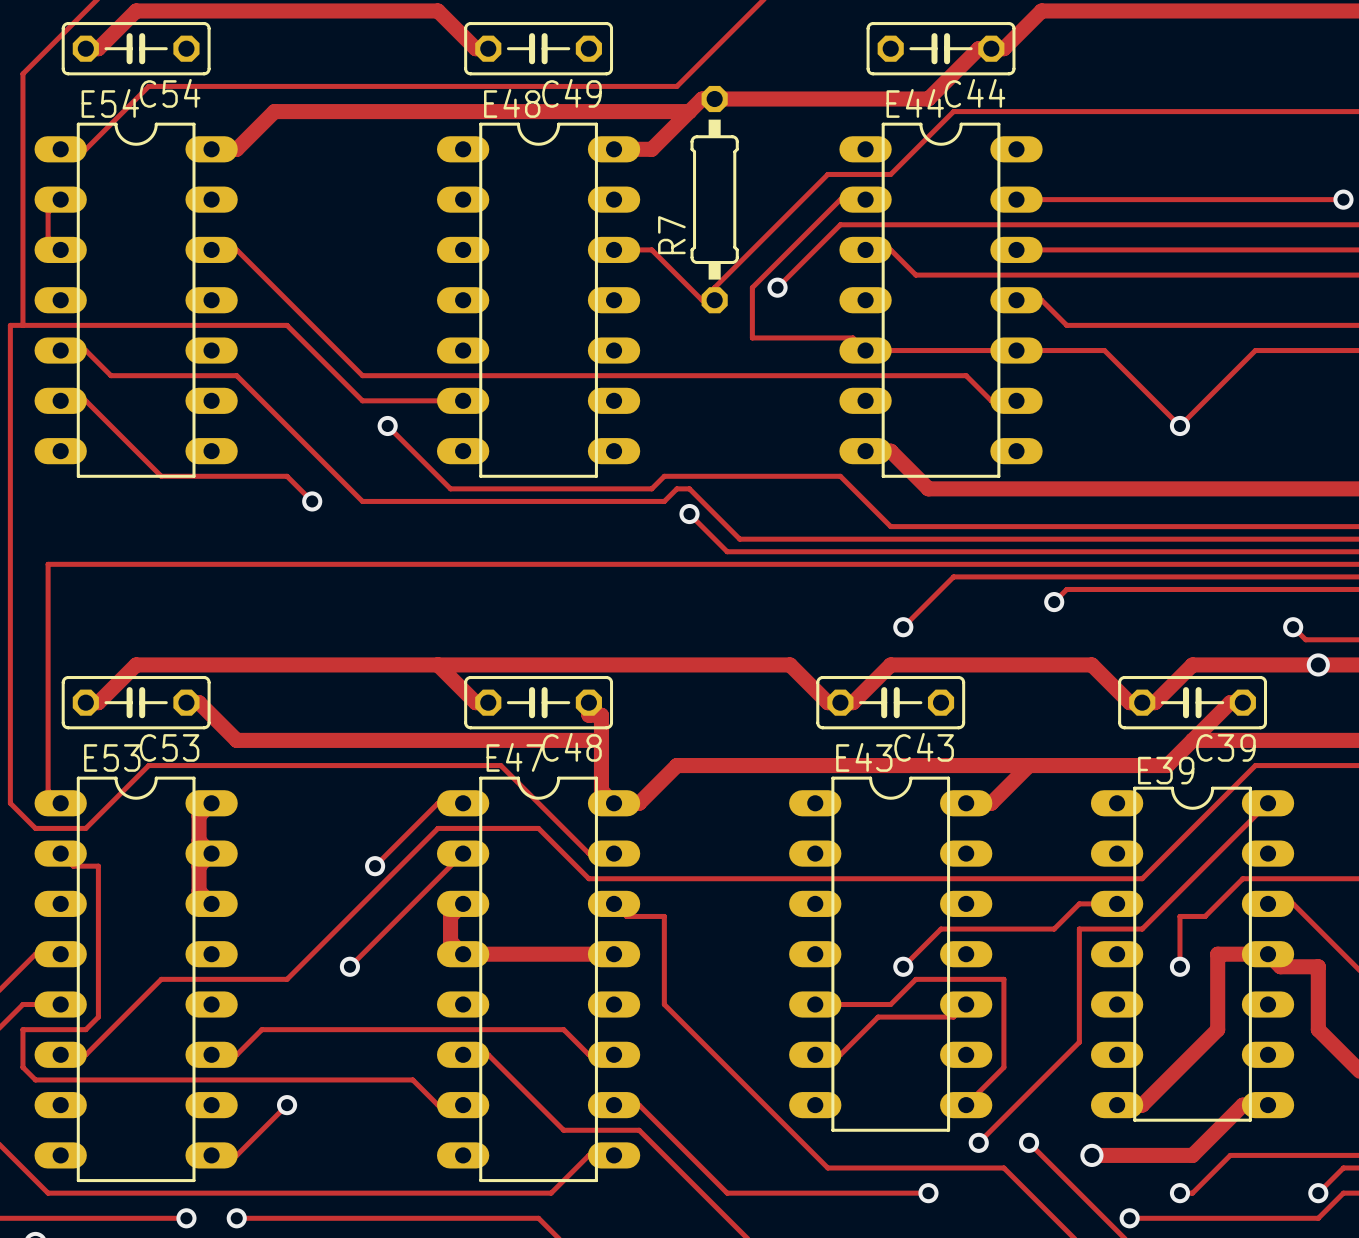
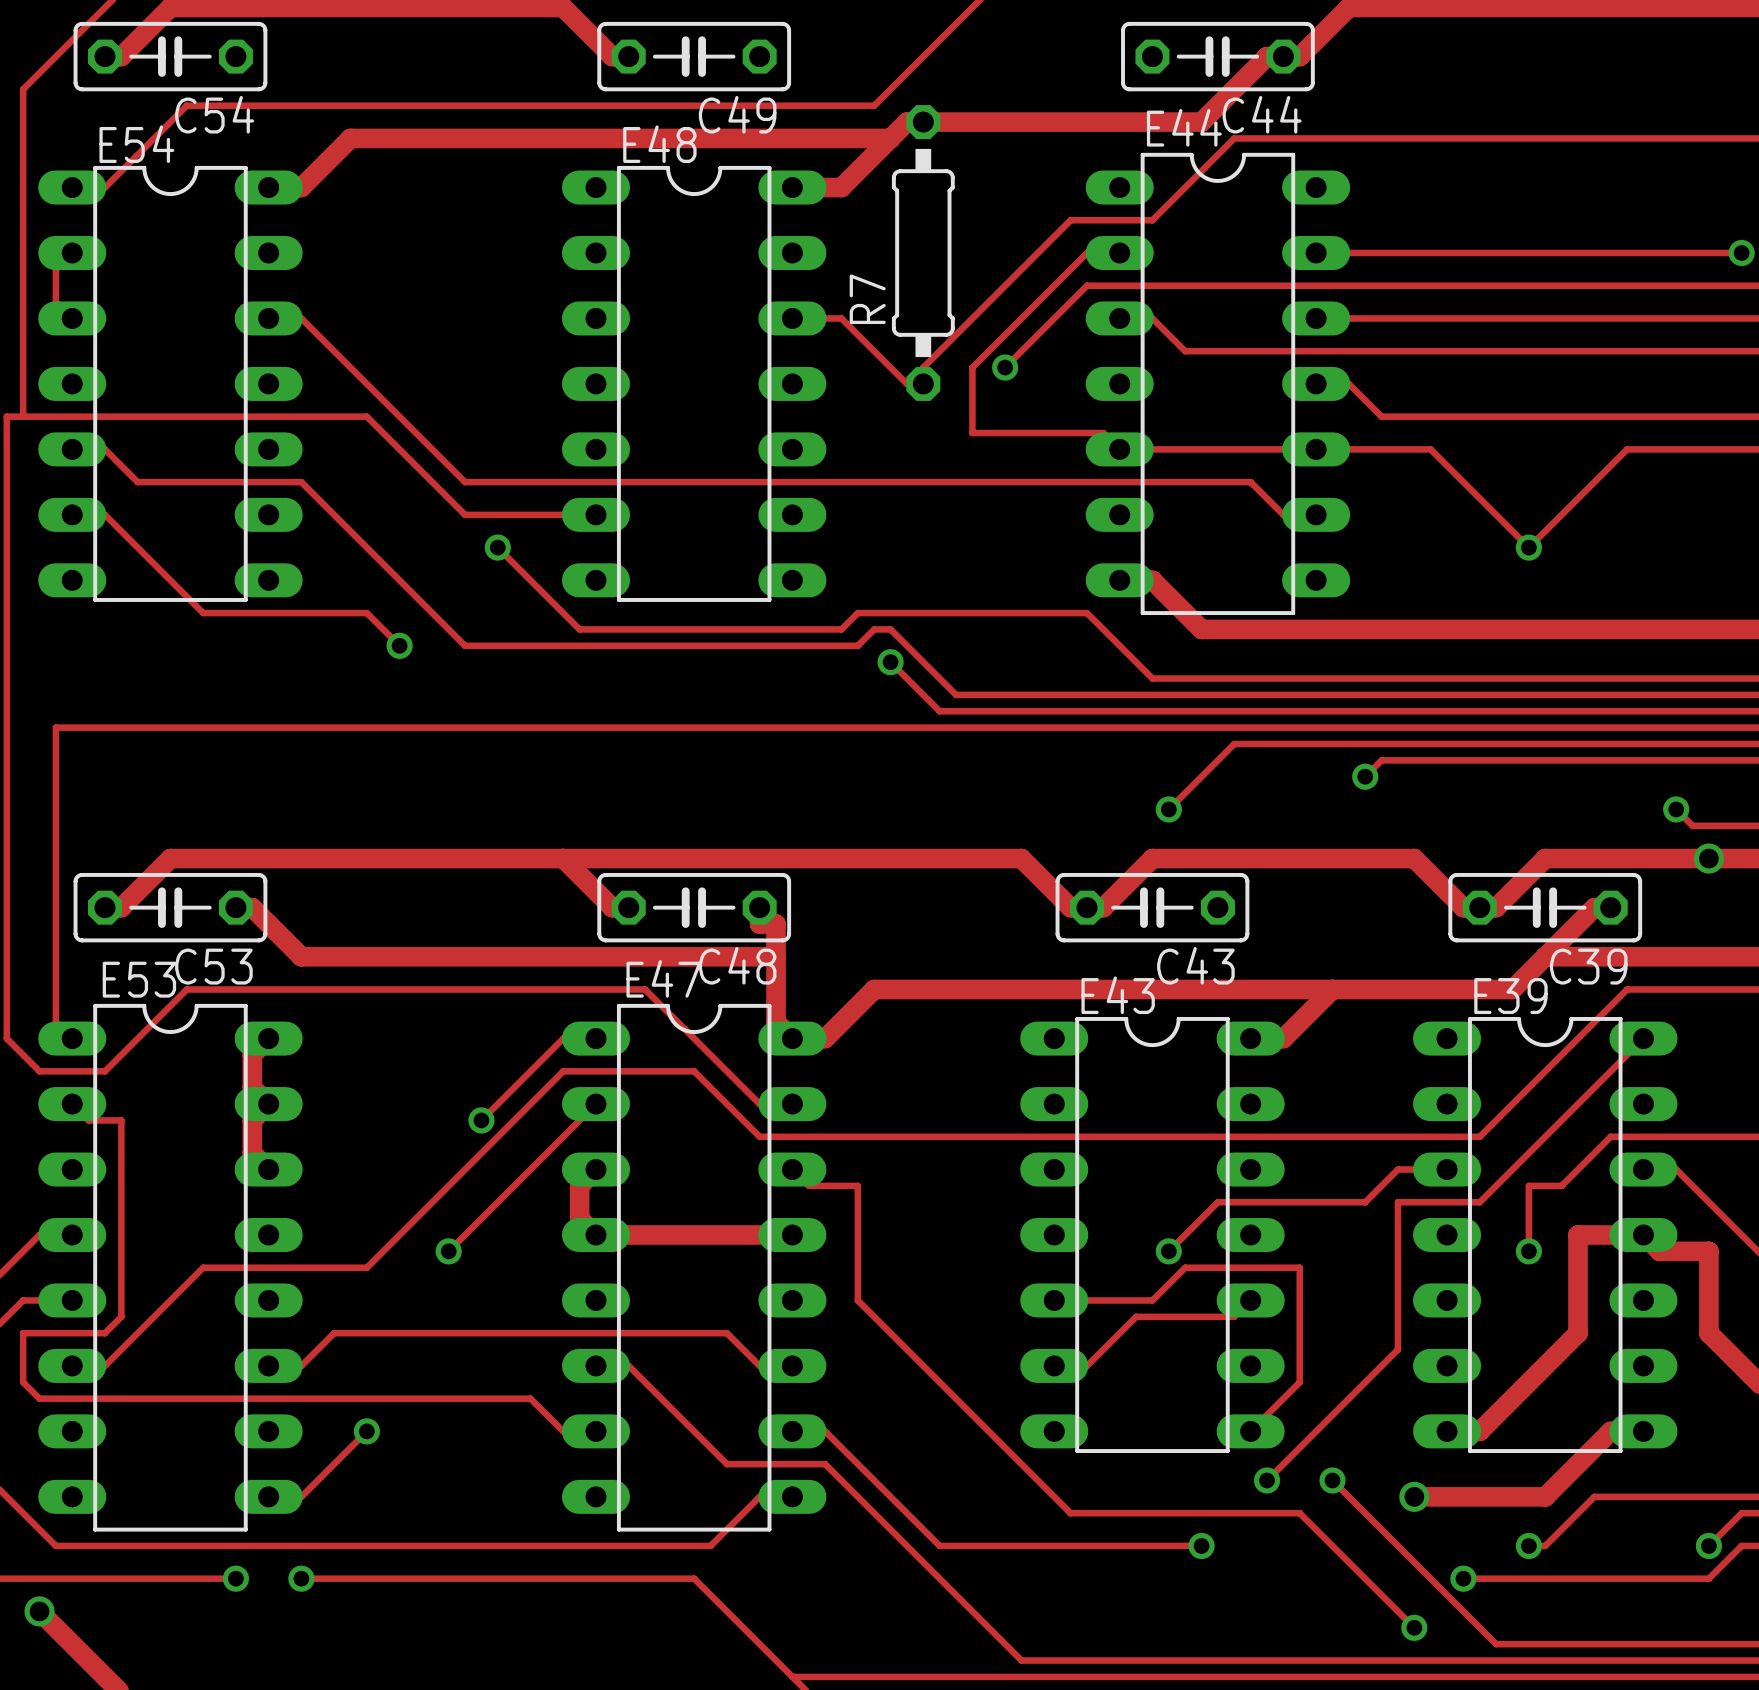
E54 name position: E54 (110, 103) -> E54 (136, 144)
E48 name position: E48 (512, 103) -> E48 (659, 144)
E54 footprint: [34, 122, 238, 478] -> [38, 165, 303, 602]
E48 footprint: [436, 122, 641, 478] -> [561, 165, 827, 602]
E43 name position: E43 (864, 757) -> E43 (1118, 995)
E43 footprint: [789, 776, 993, 1132] -> [1020, 1016, 1285, 1453]

